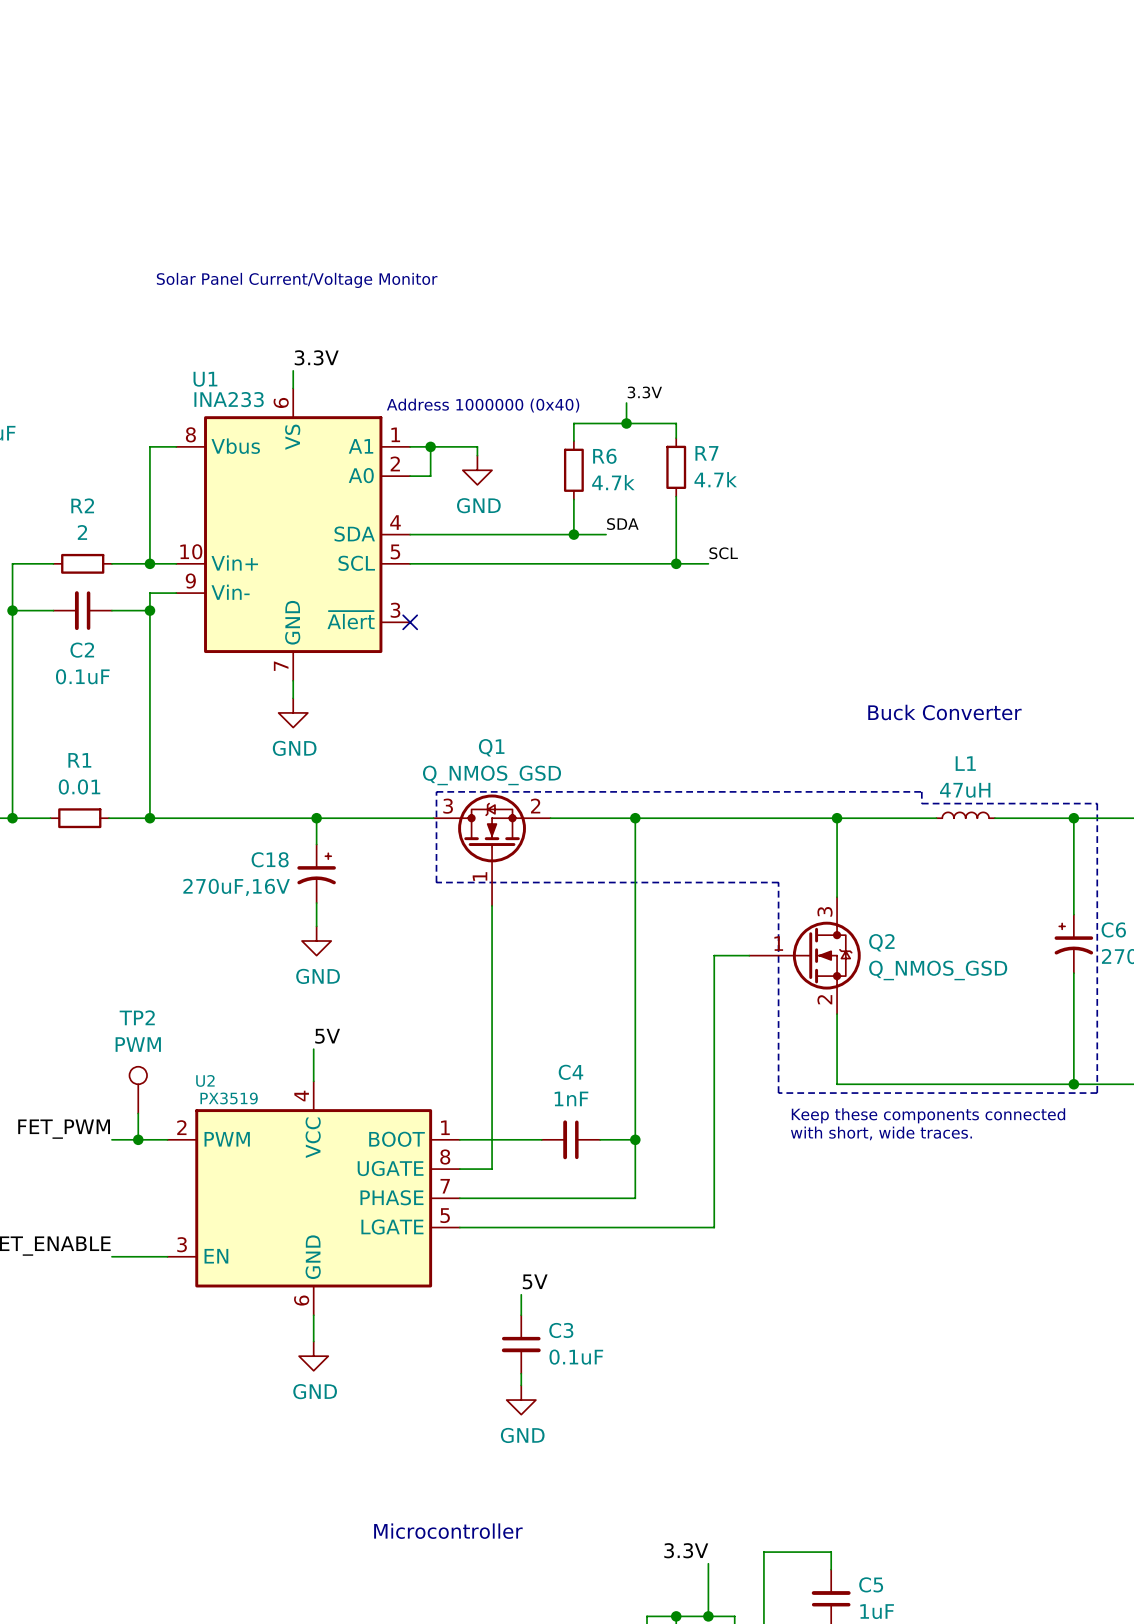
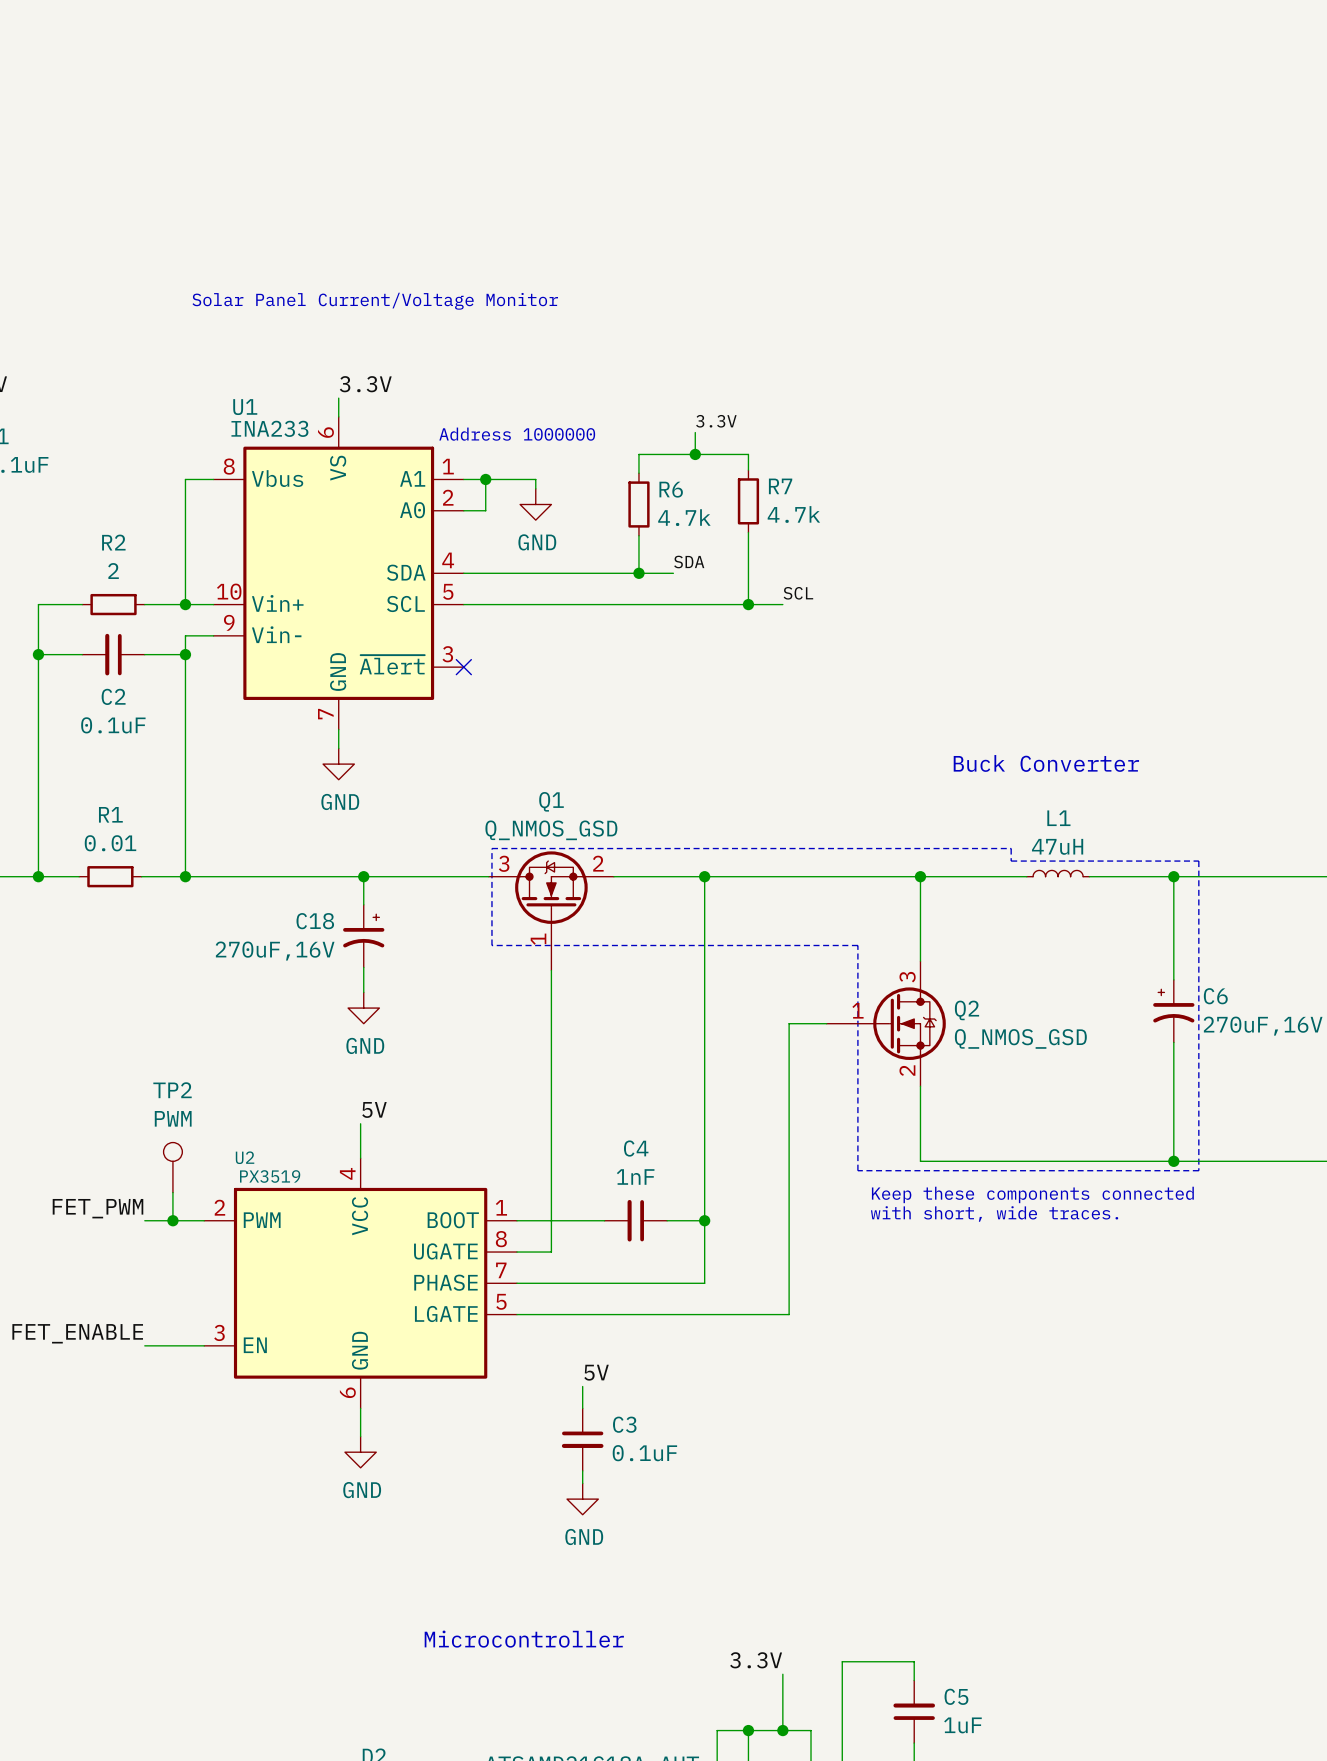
text: Address 1000000 (0x40) (483, 405) -> Address 1000000 (517, 434)

